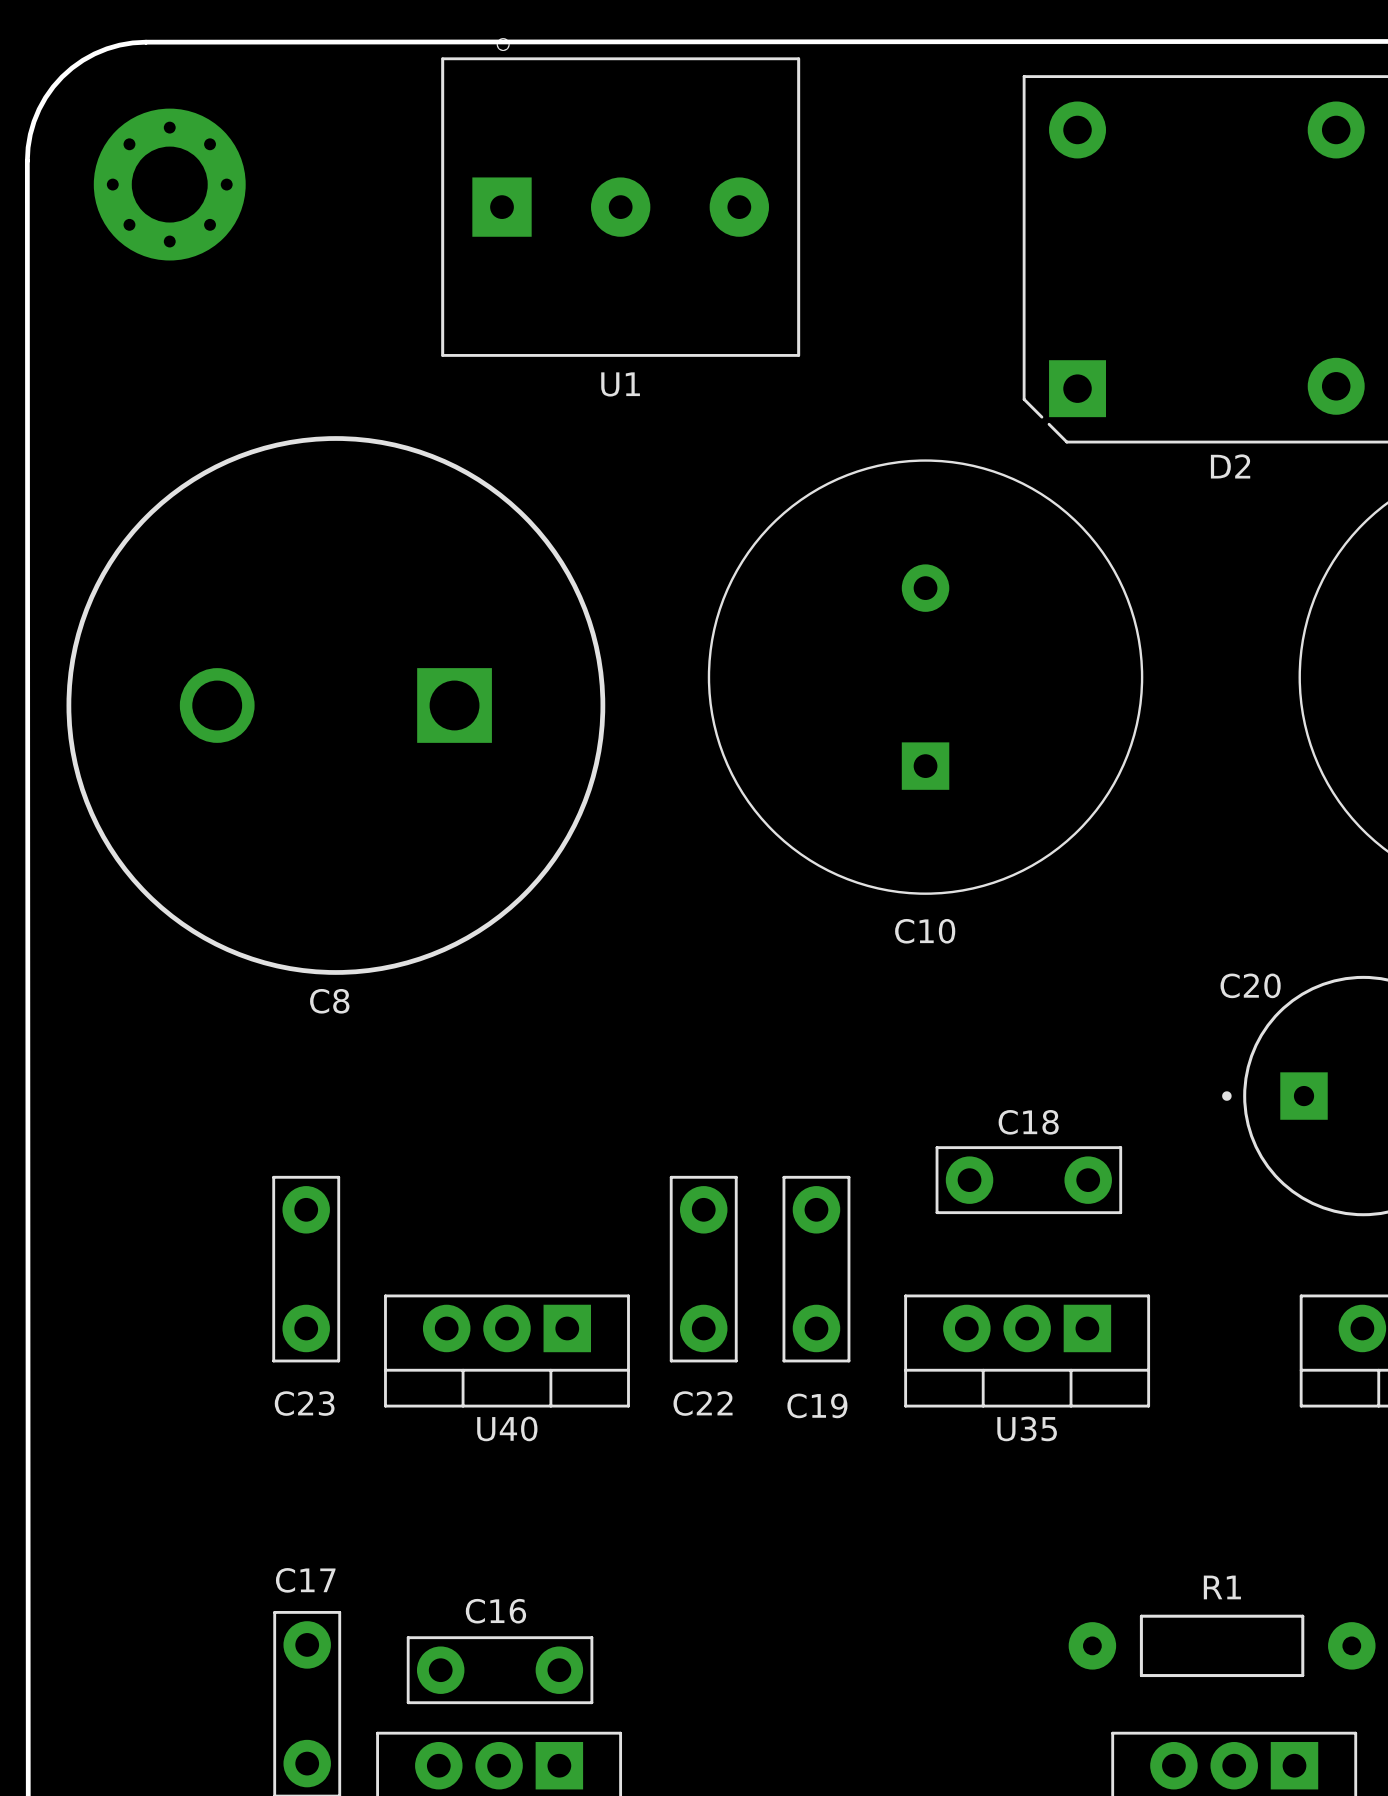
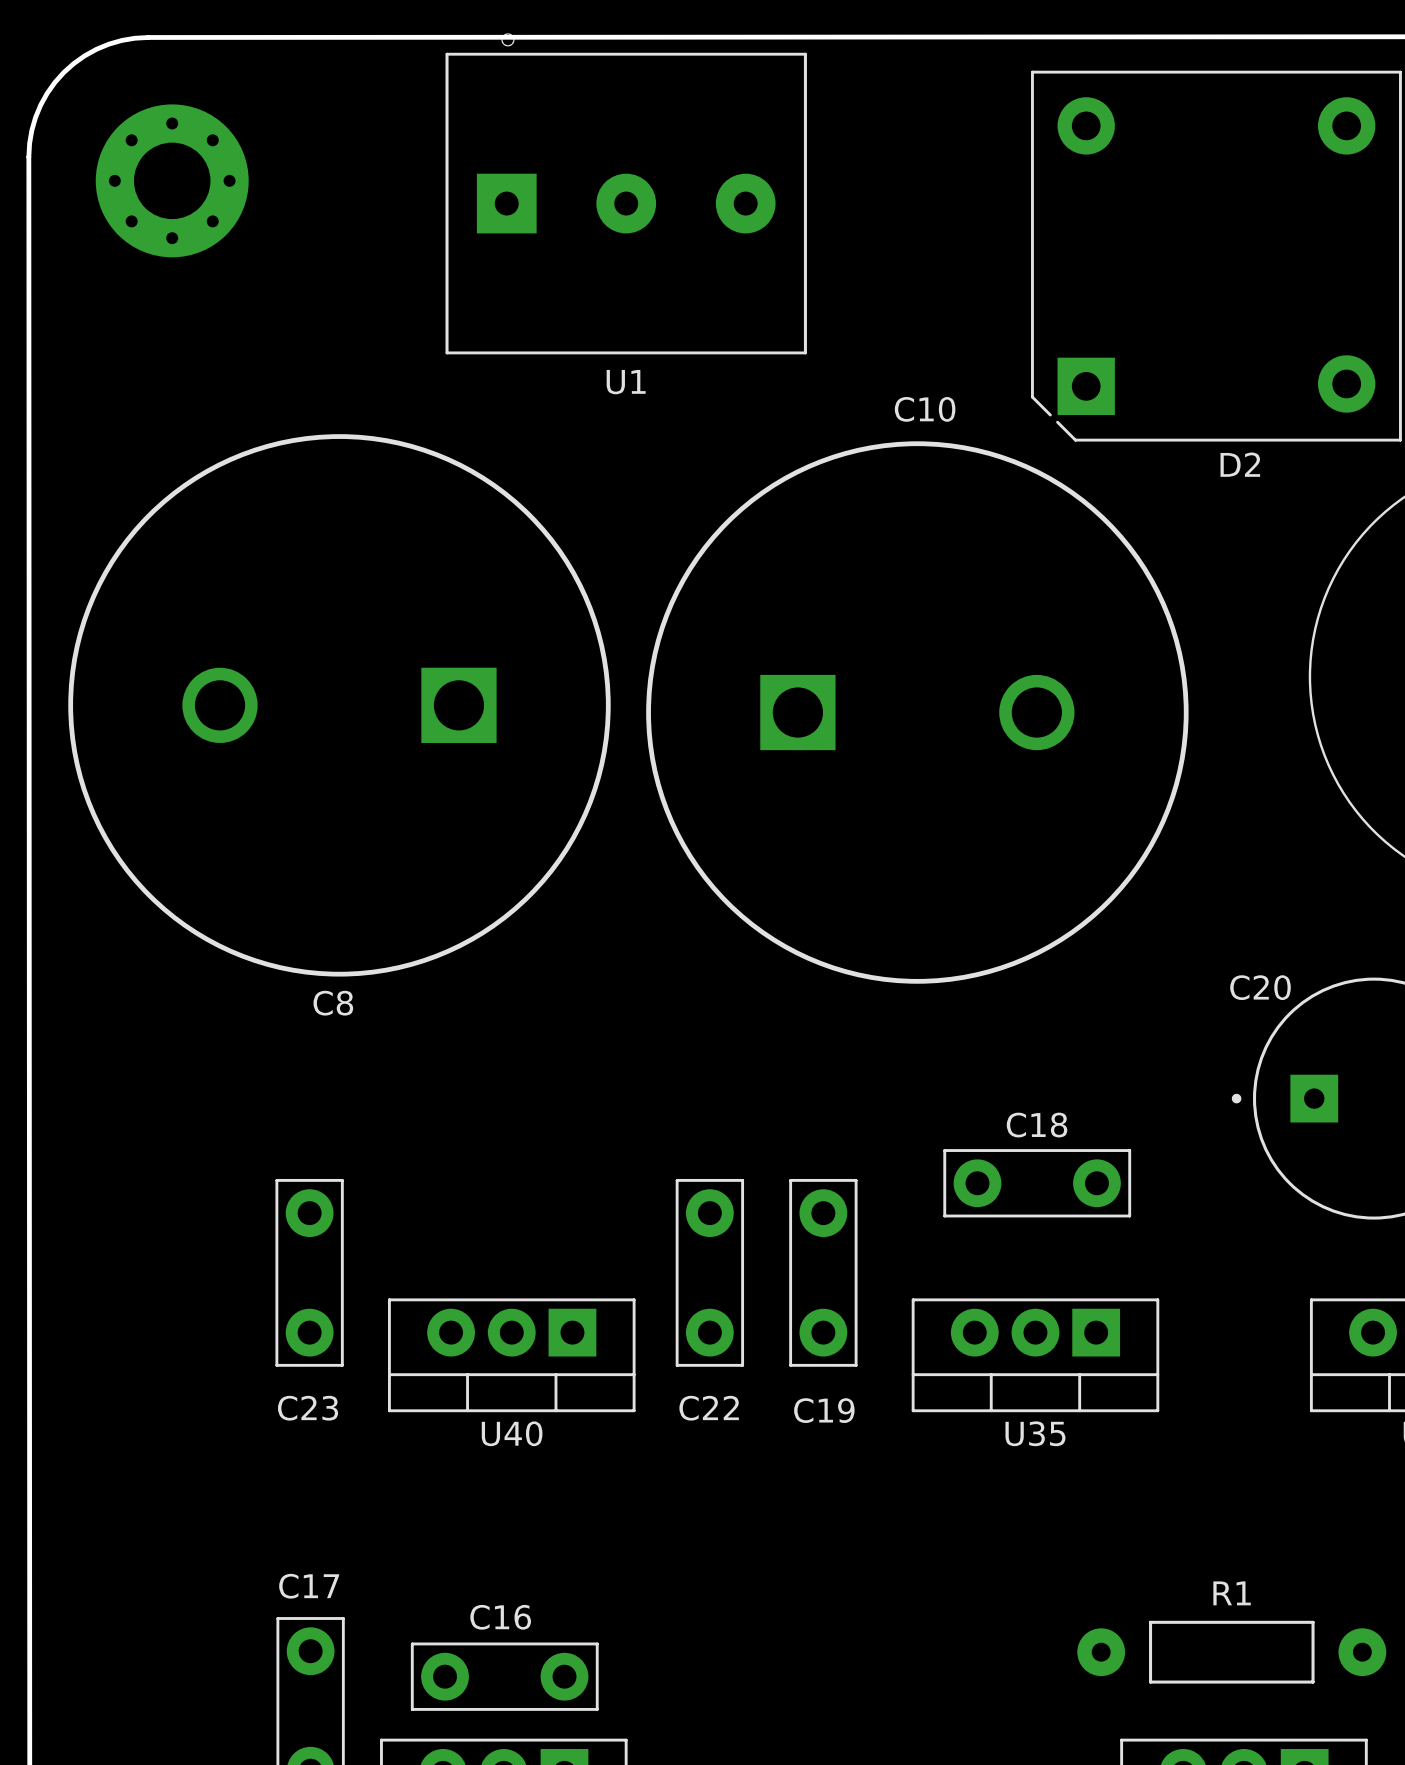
C10 footprint: [707, 459, 1144, 895] -> [646, 441, 1189, 984]
C10 name position: C10 (925, 931) -> C10 (925, 409)

